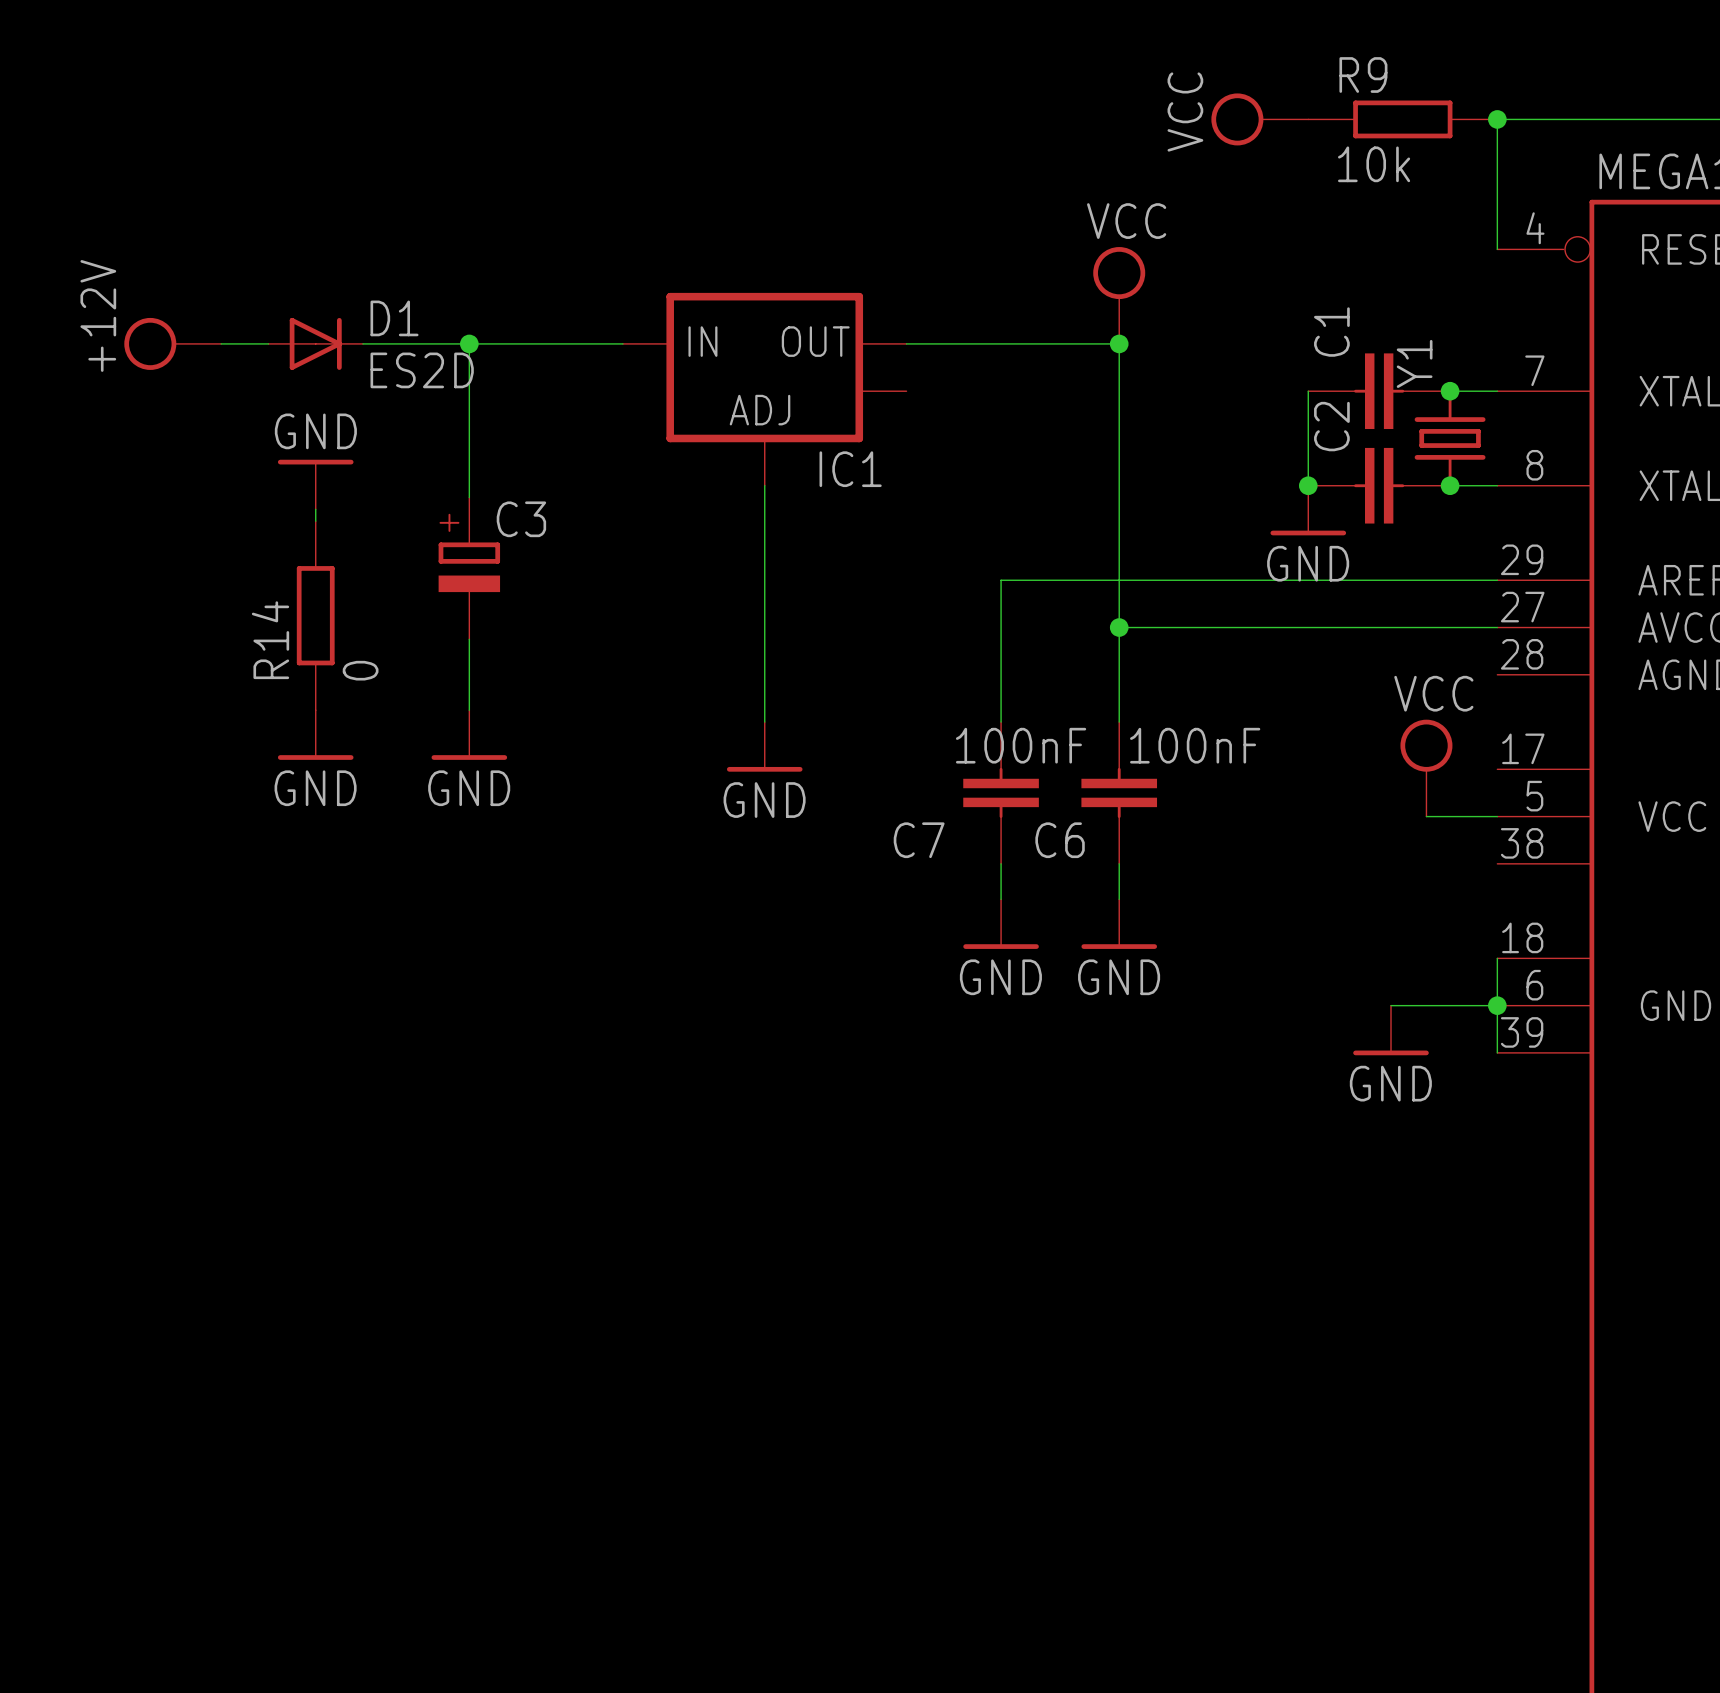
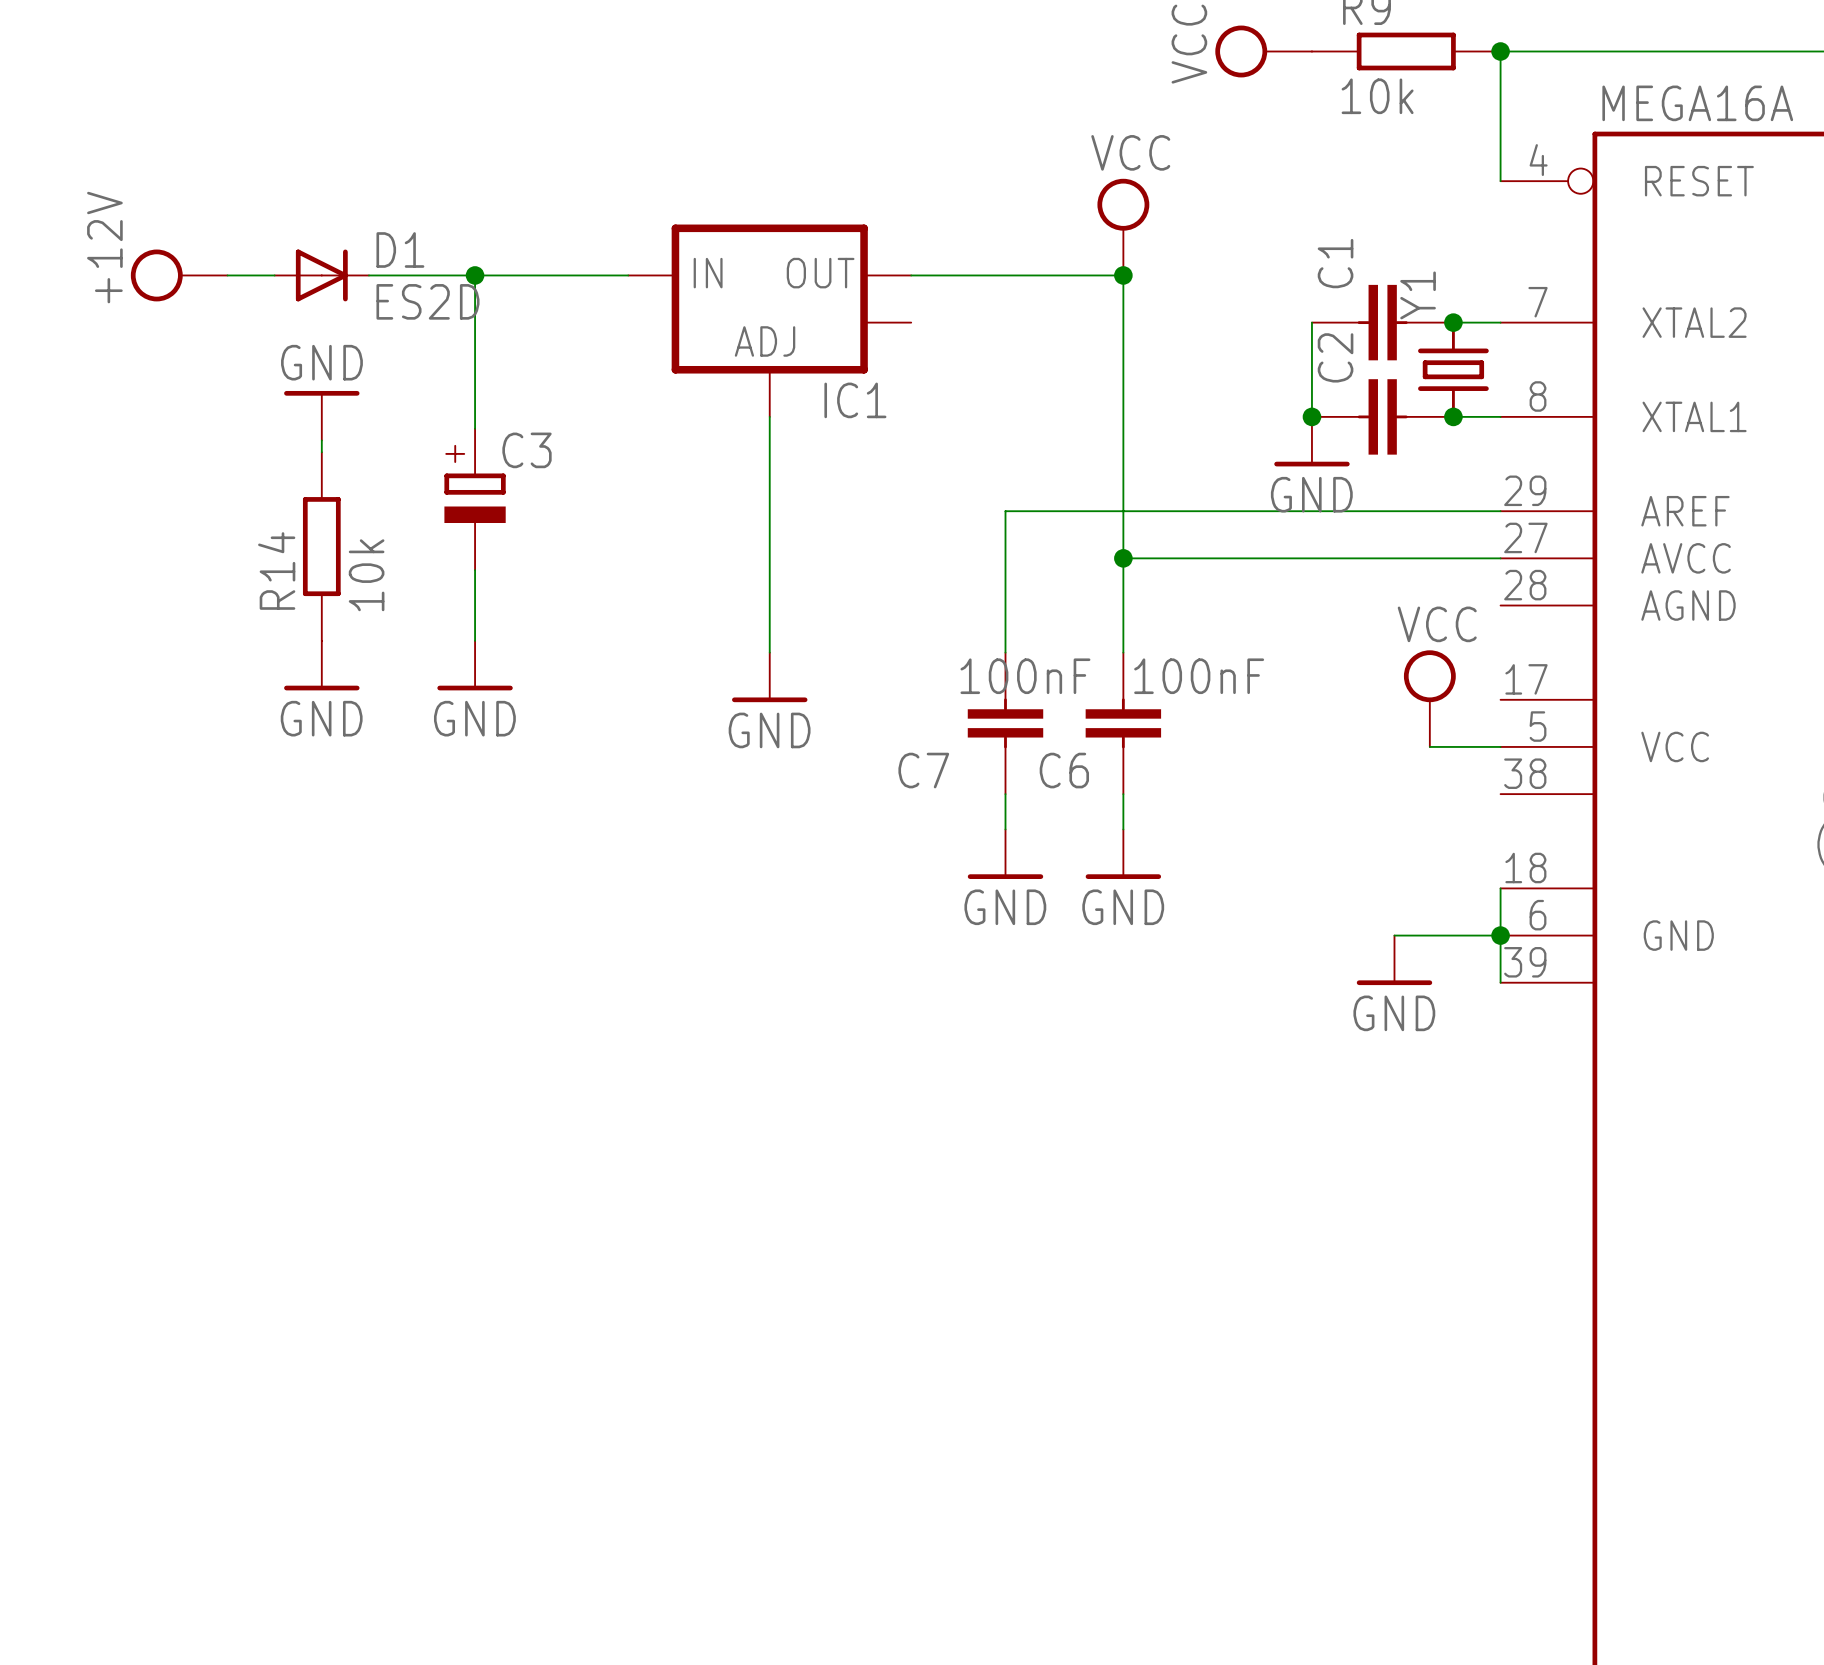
R14 value: 0 (360, 670) -> 10k (366, 575)

